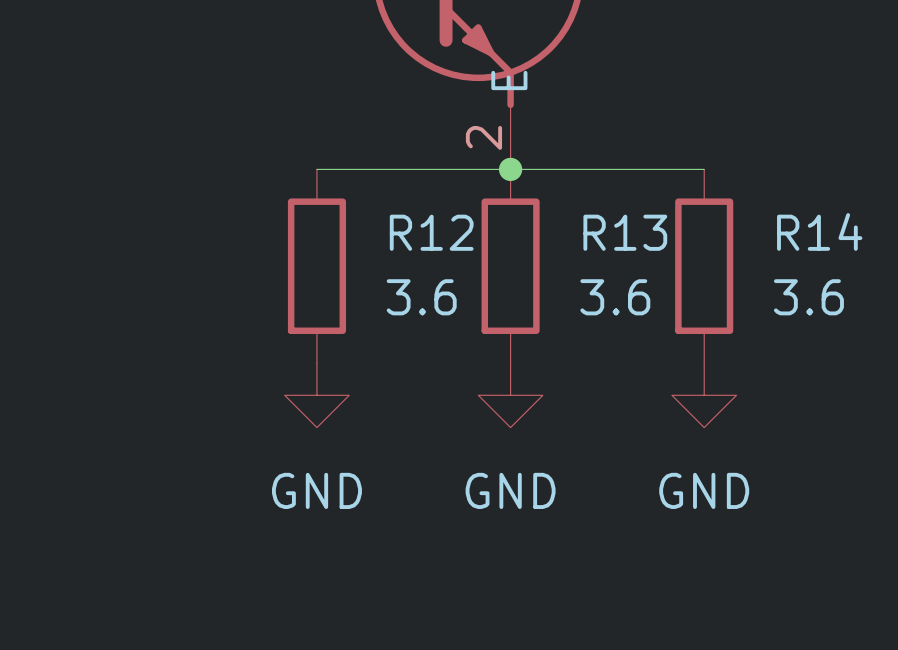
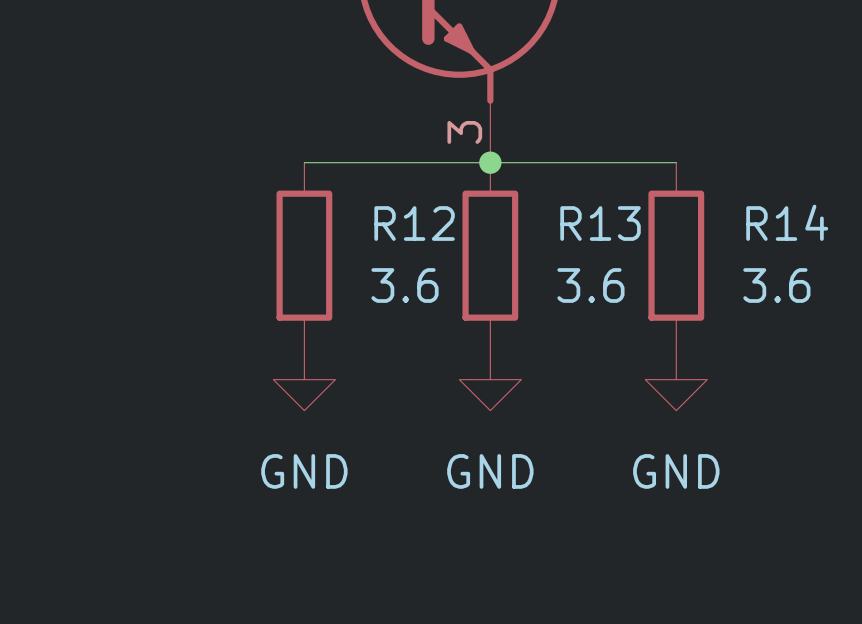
part pin name: E (509, 80) -> none
part pin number: 2 (483, 137) -> 3 (464, 132)

